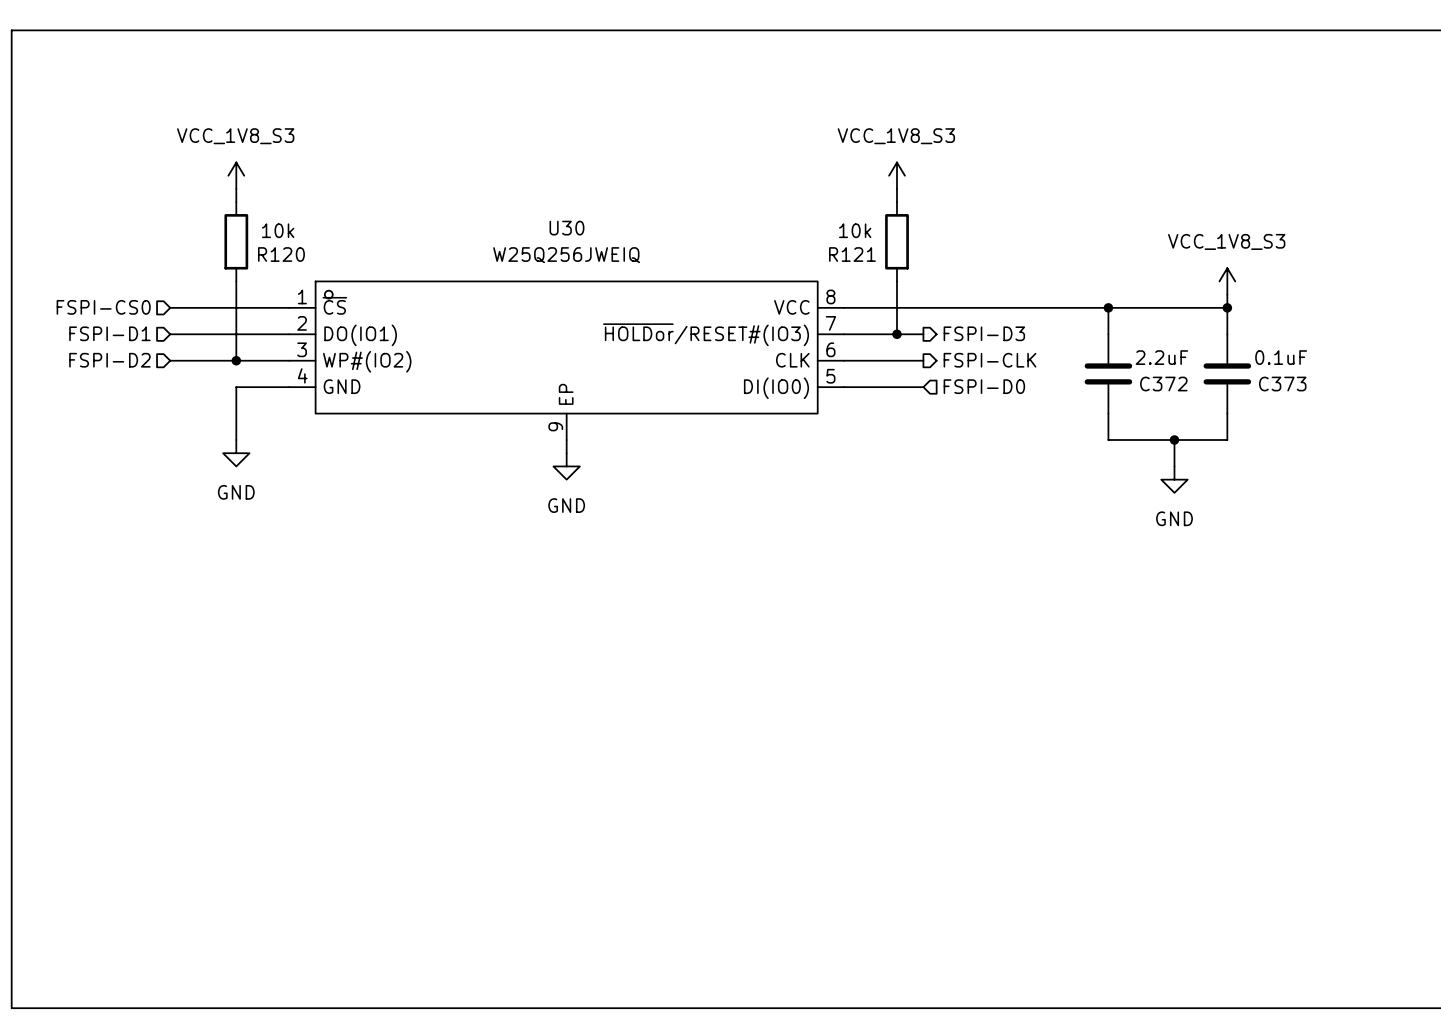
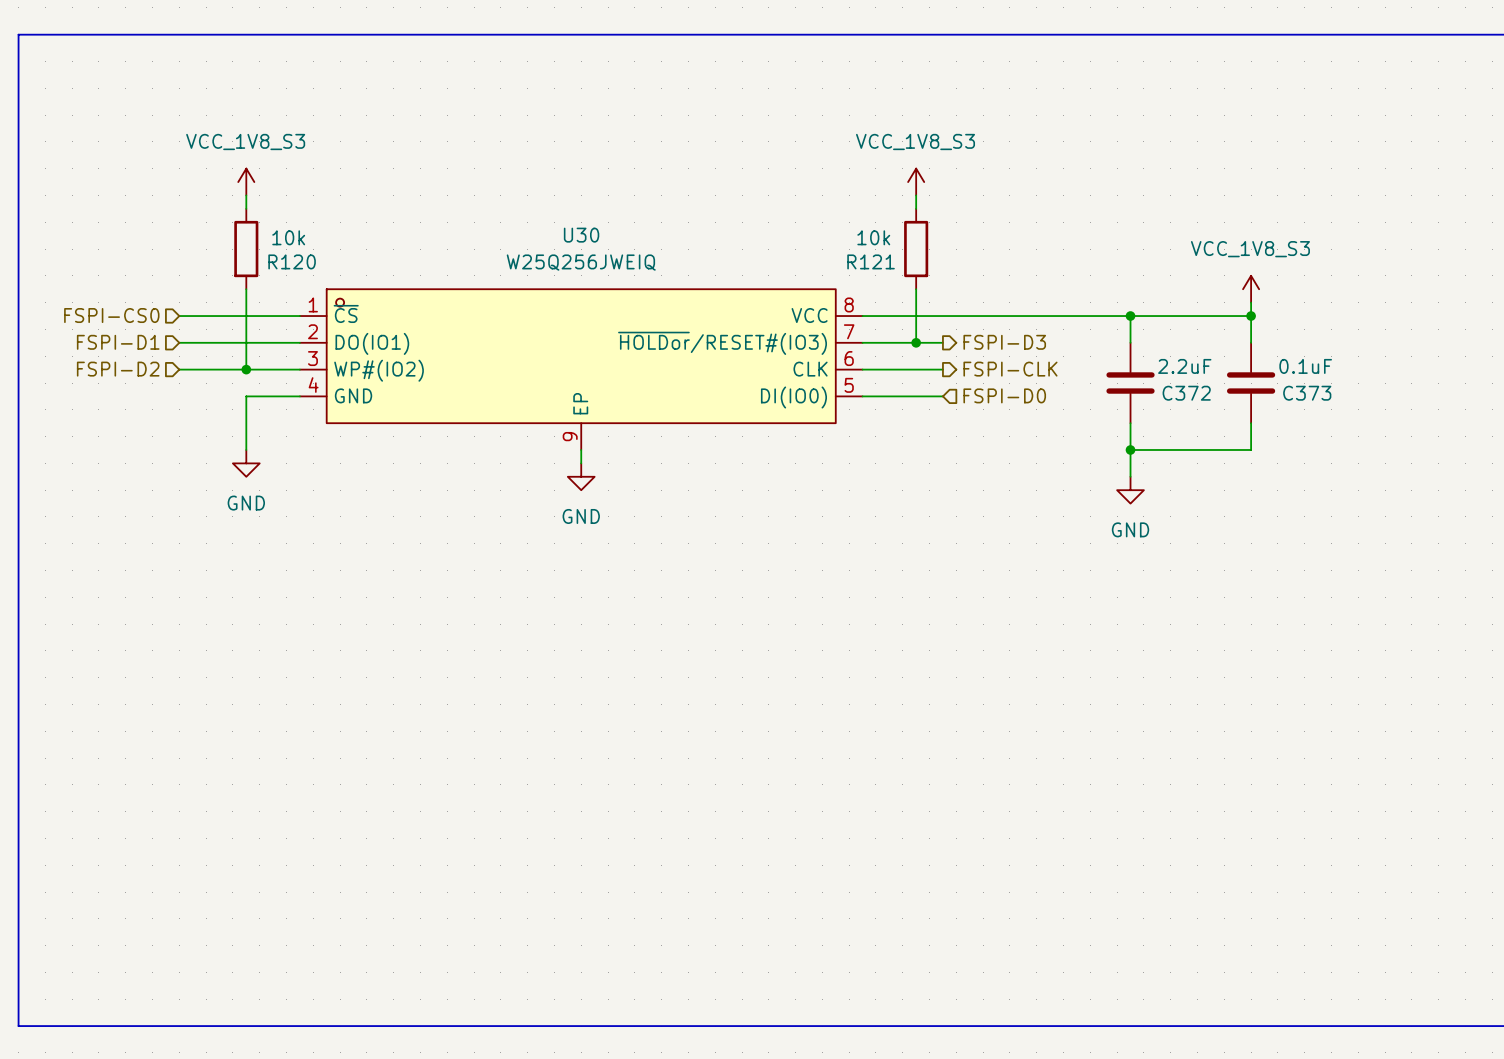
junction: none -> (1130, 449)
wire: (1174, 440) (1174, 466) -> (1130, 449) (1130, 476)
junction: (1174, 440) -> none
power symbol position: GND (1174, 479) -> GND (1130, 490)

